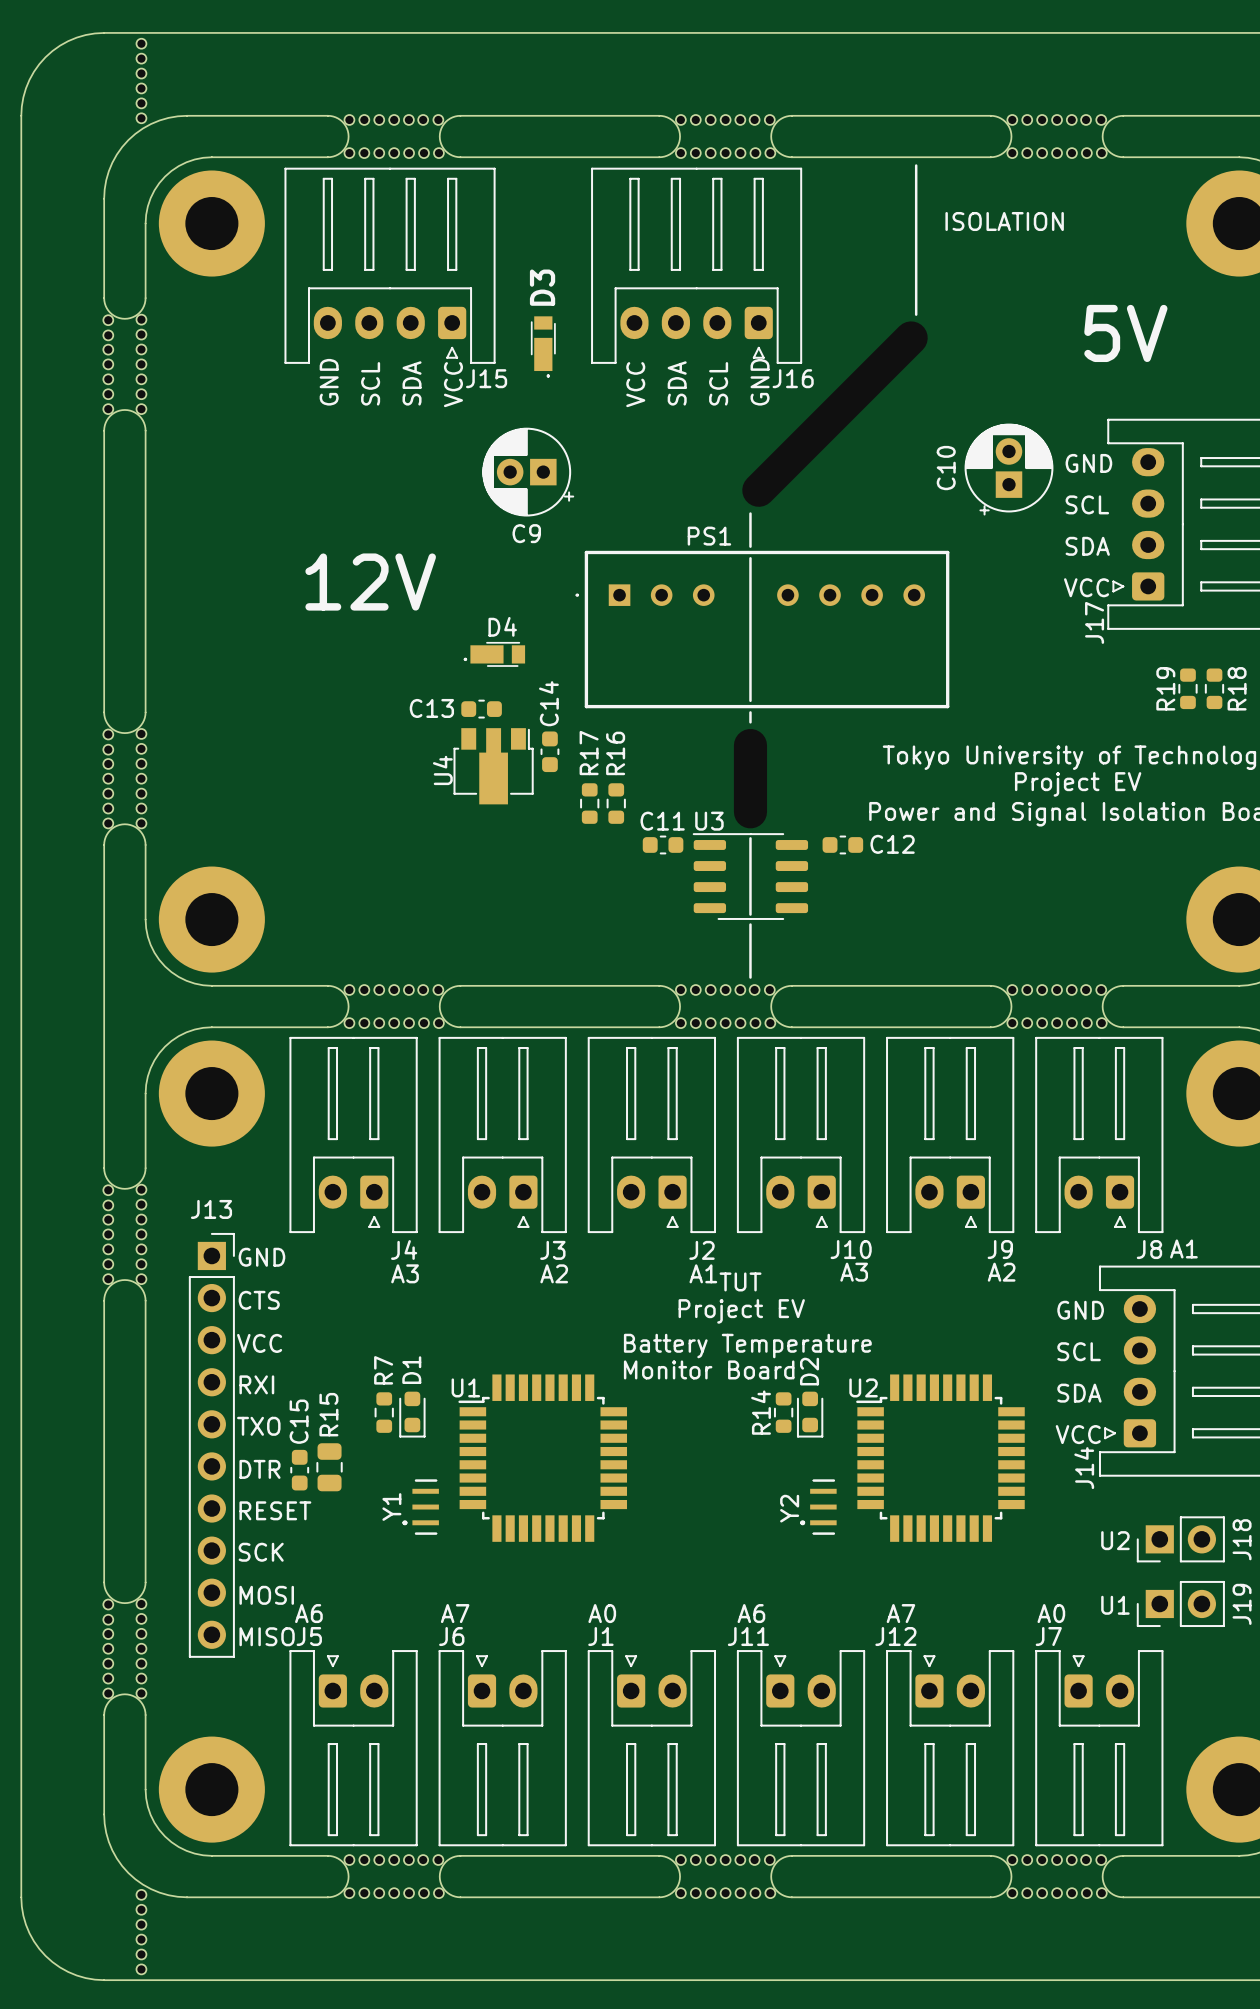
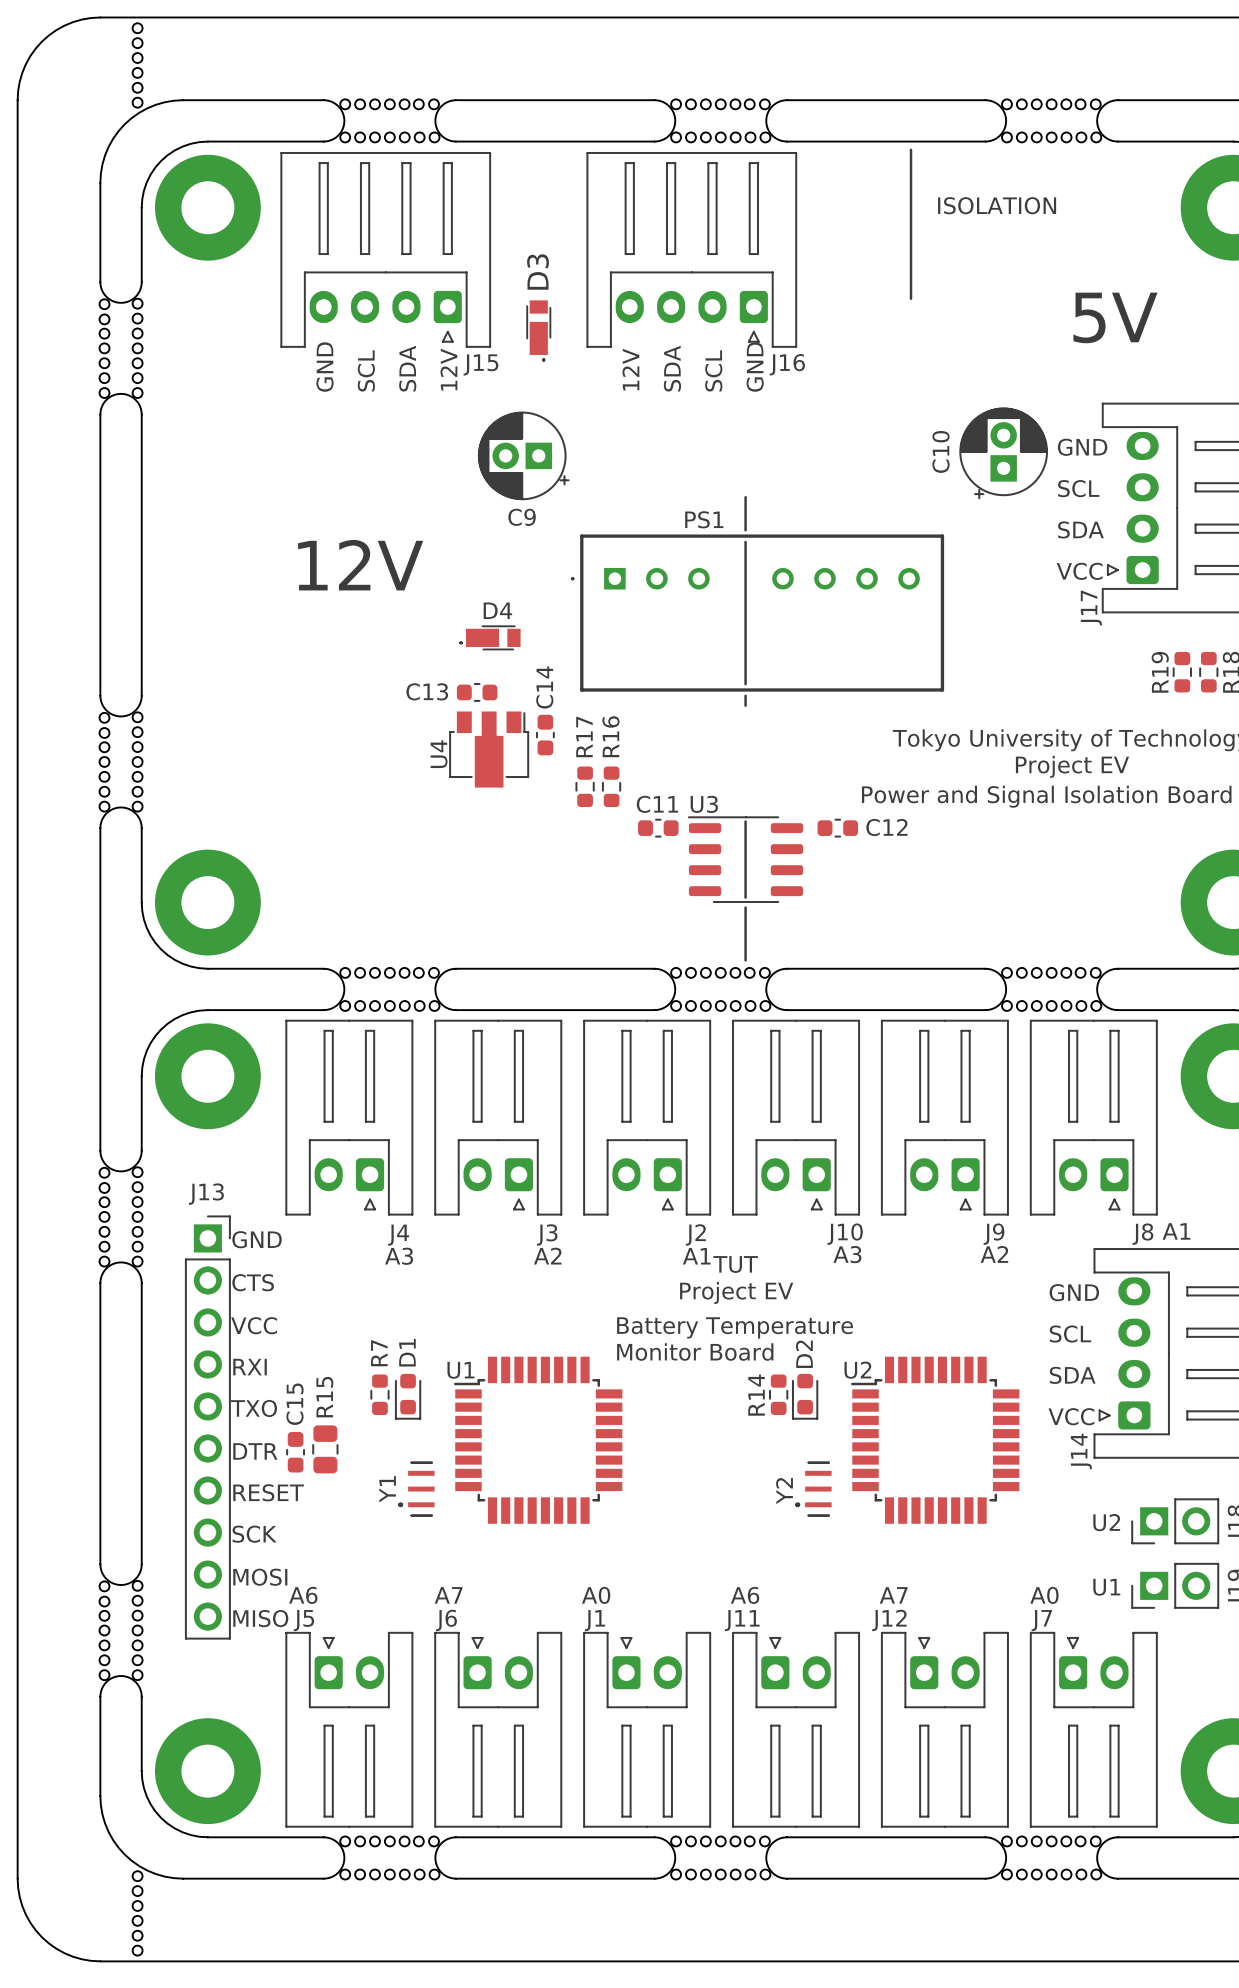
text: VCC (453, 384) -> 12V (448, 369)
text: VCC (635, 384) -> 12V (630, 369)

